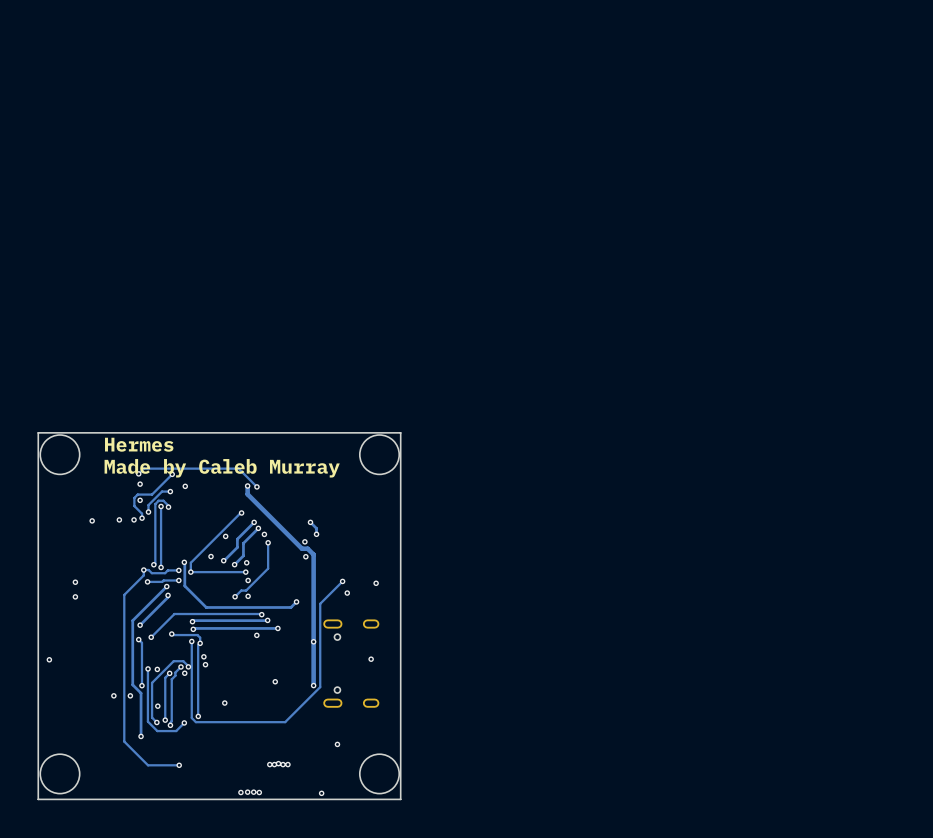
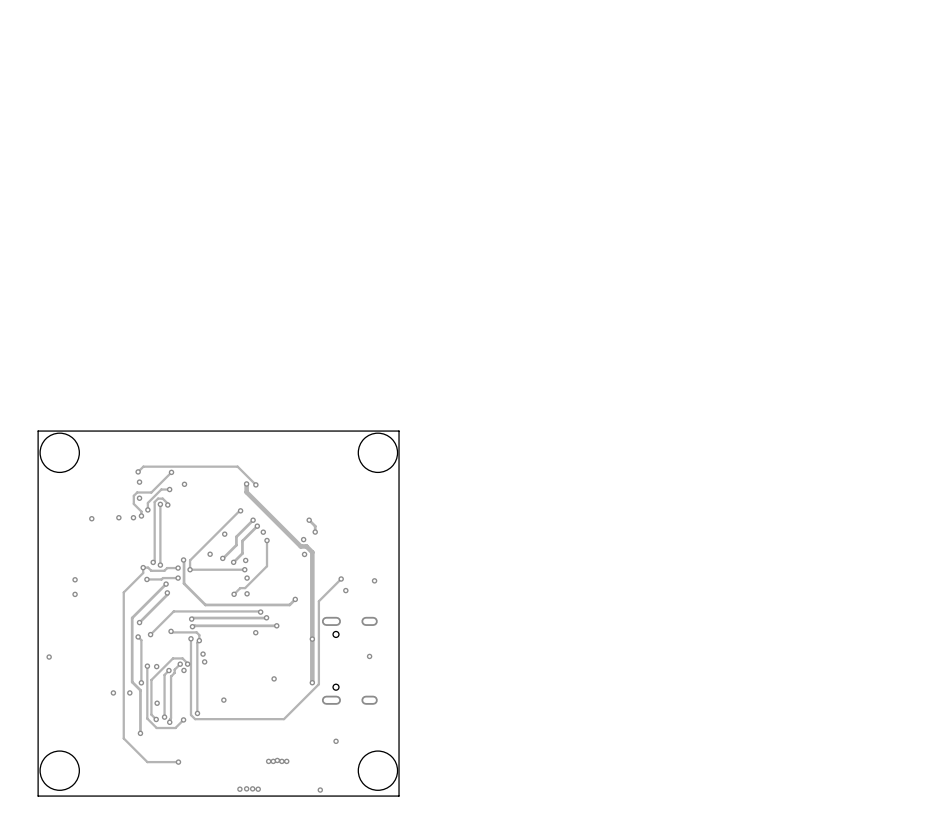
text: Hermes (139, 444) -> none
text: Made by Caleb Murray (222, 468) -> none

